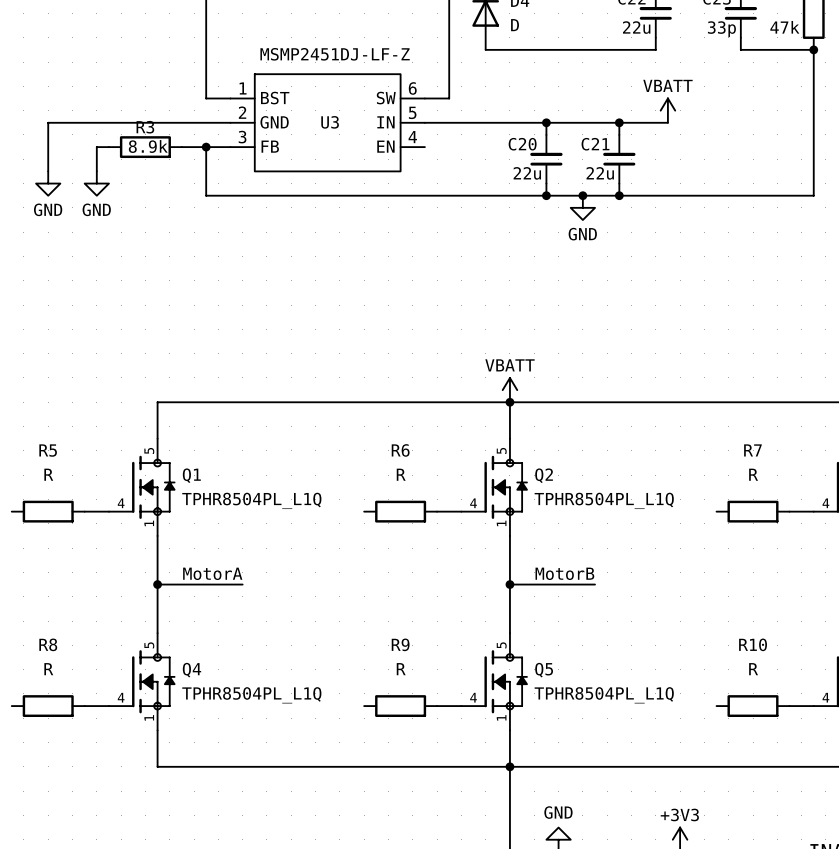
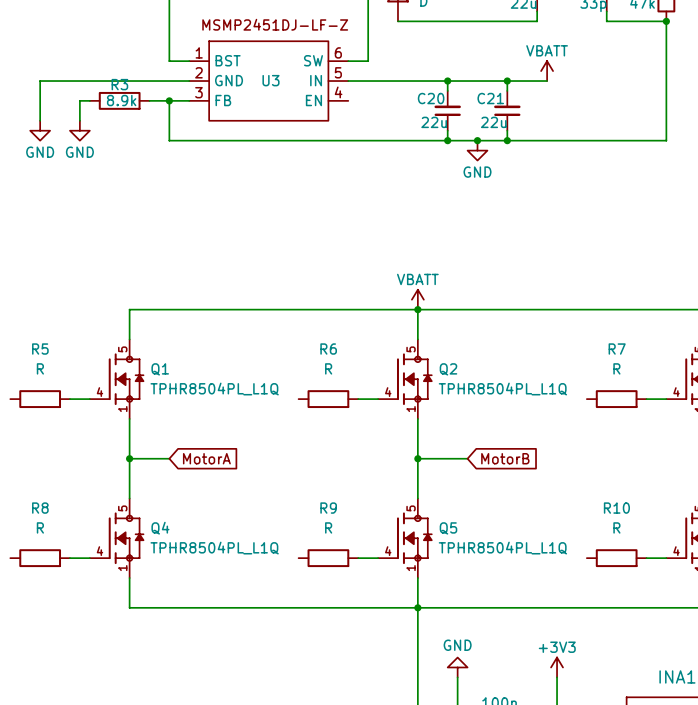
label: MotorA (212, 573) -> none
label: MotorB (564, 573) -> none
wire: (206, 584) (242, 584) -> none
global label: none -> MotorA (206, 458)
wire: (570, 584) (595, 584) -> none
global label: none -> MotorB (505, 458)

